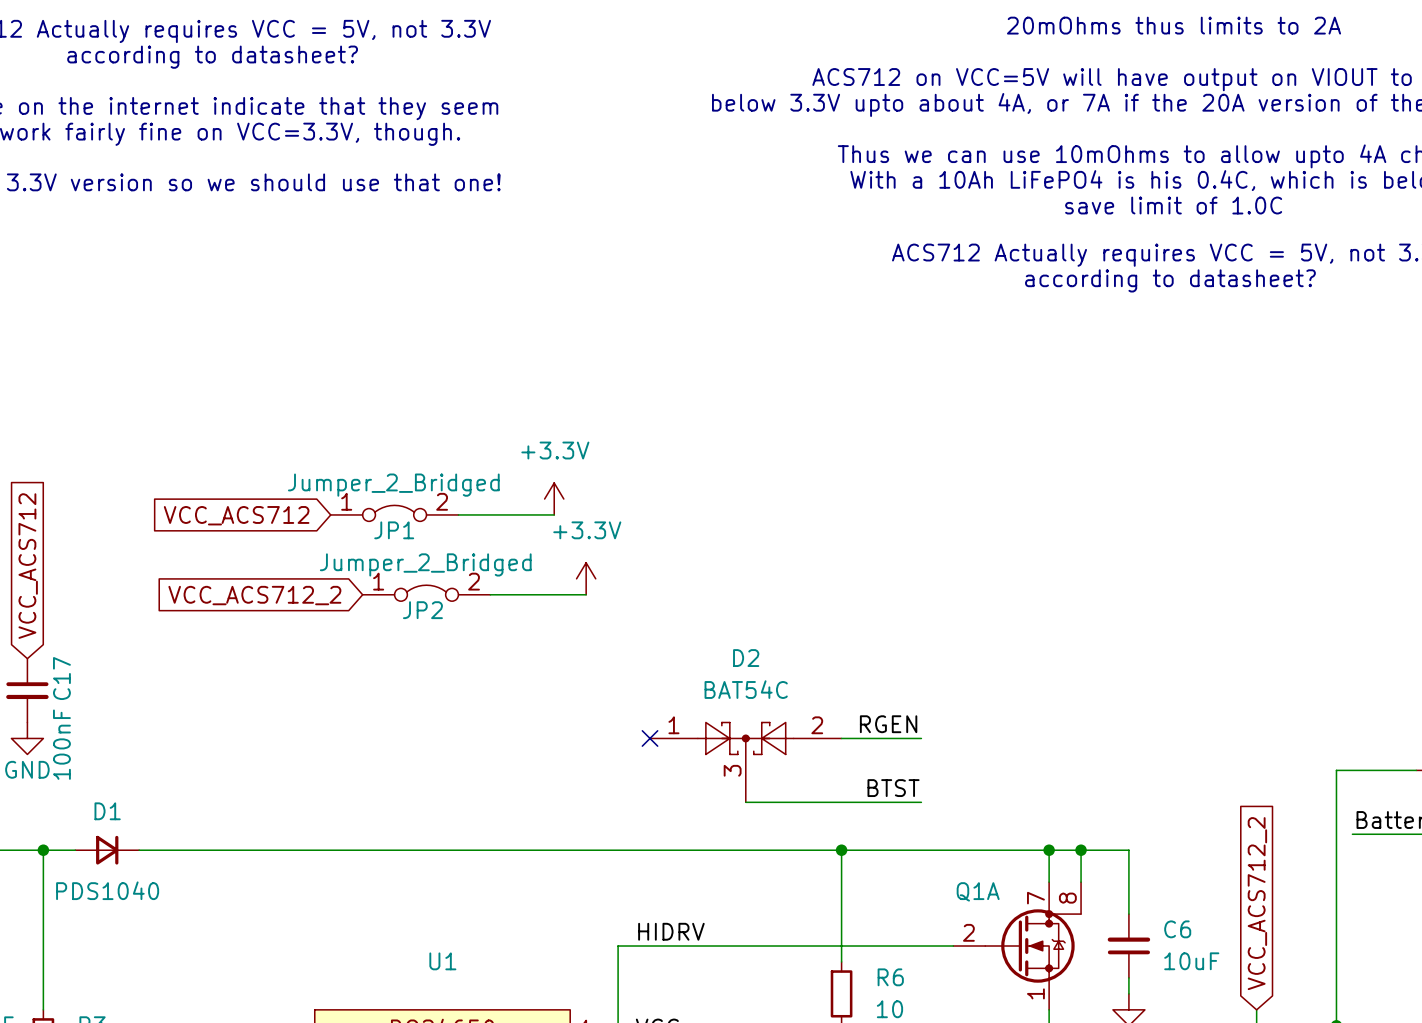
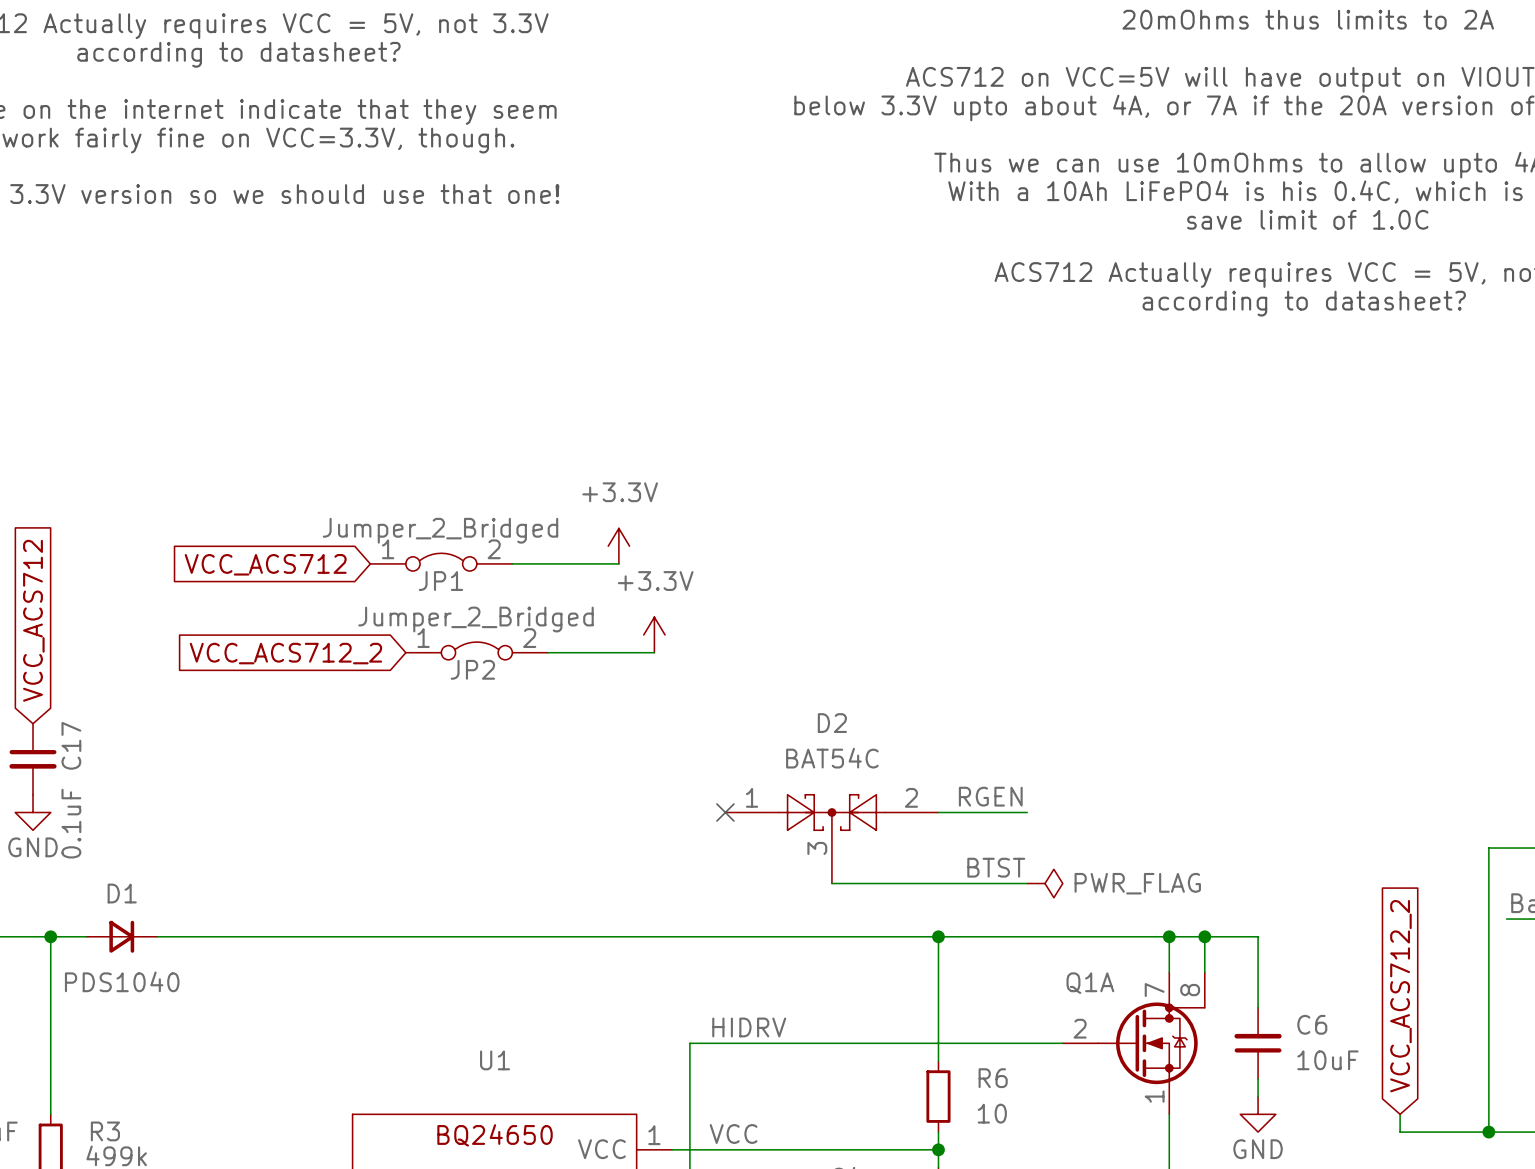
C17 value: 100nF (61, 744) -> 0.1uF (71, 823)
power symbol: none -> PWR_FLAG (1045, 883)

